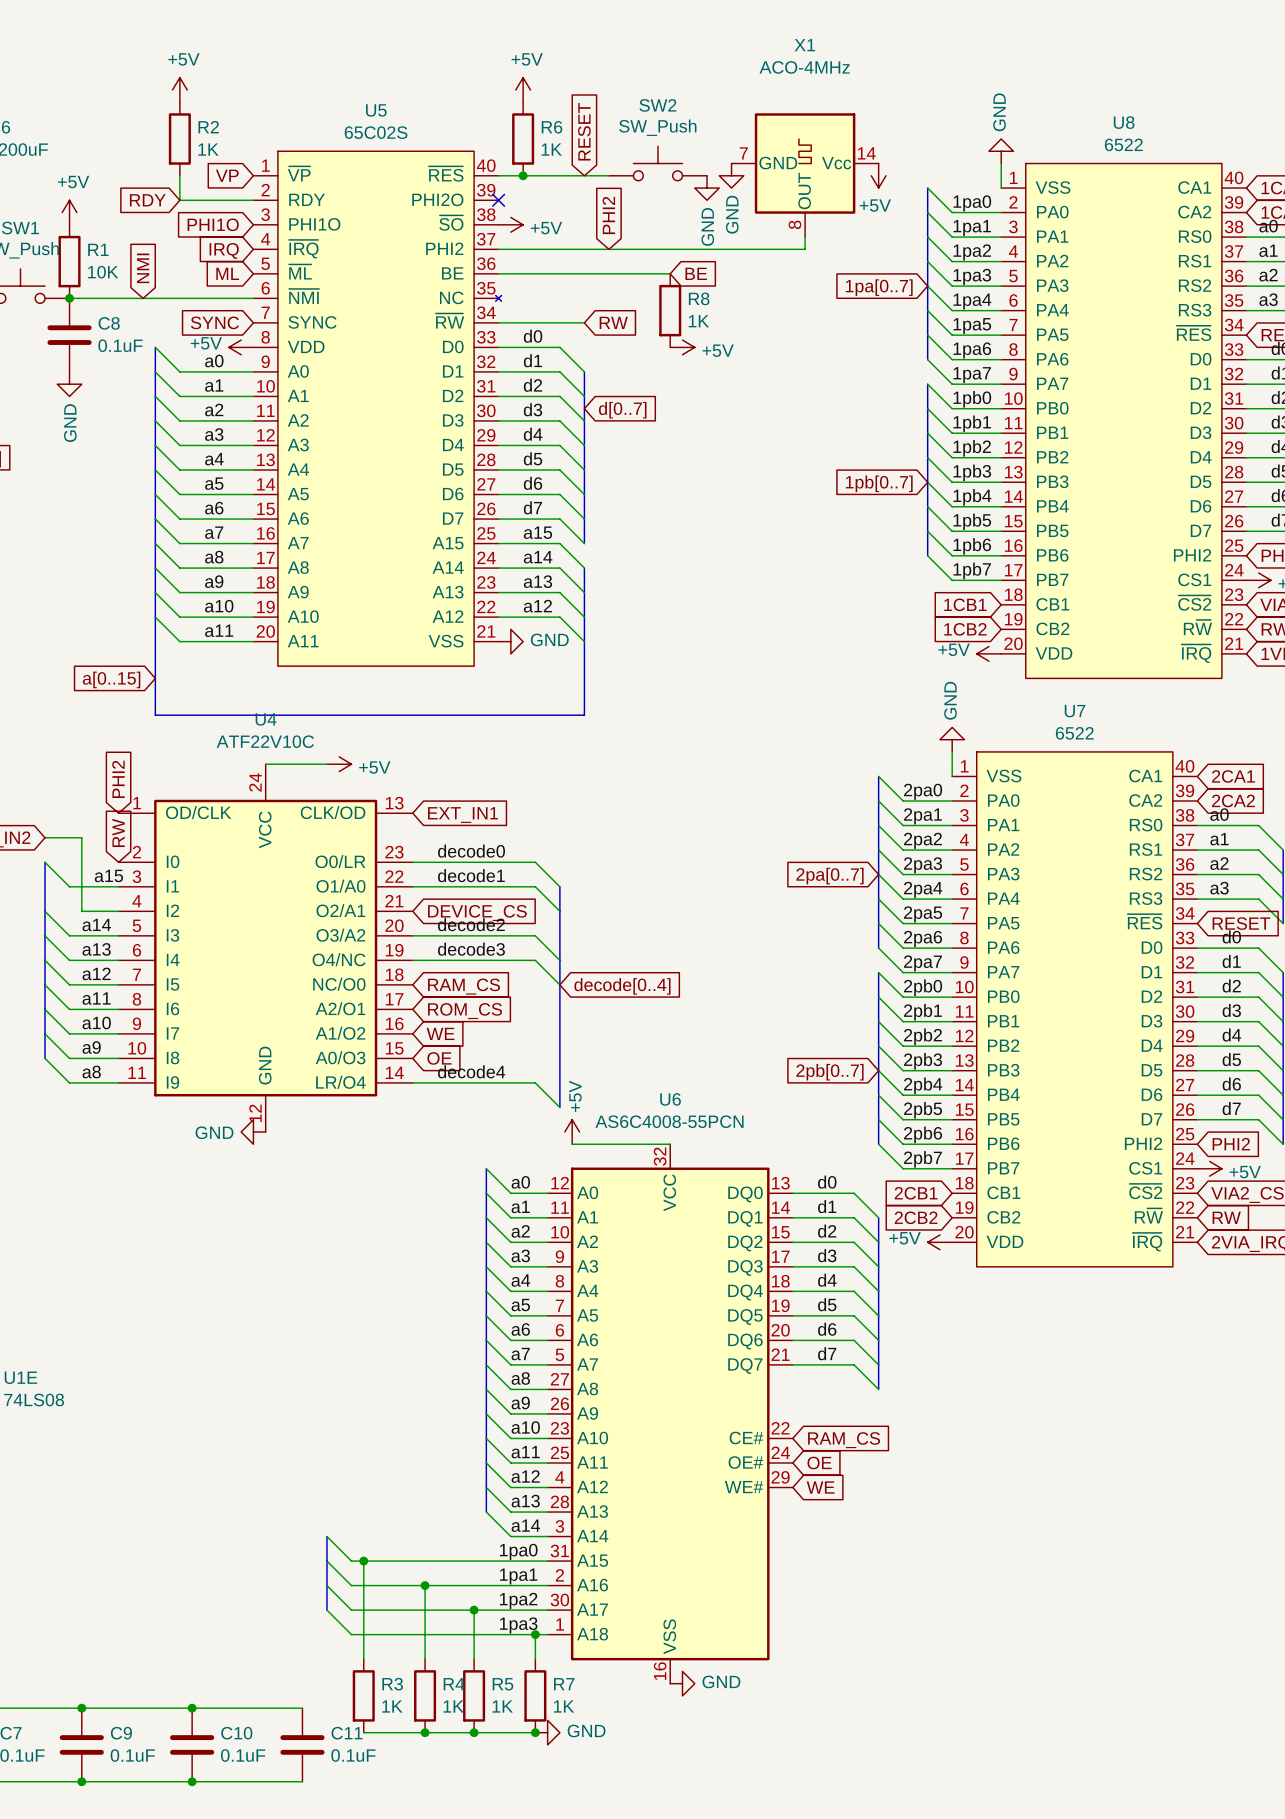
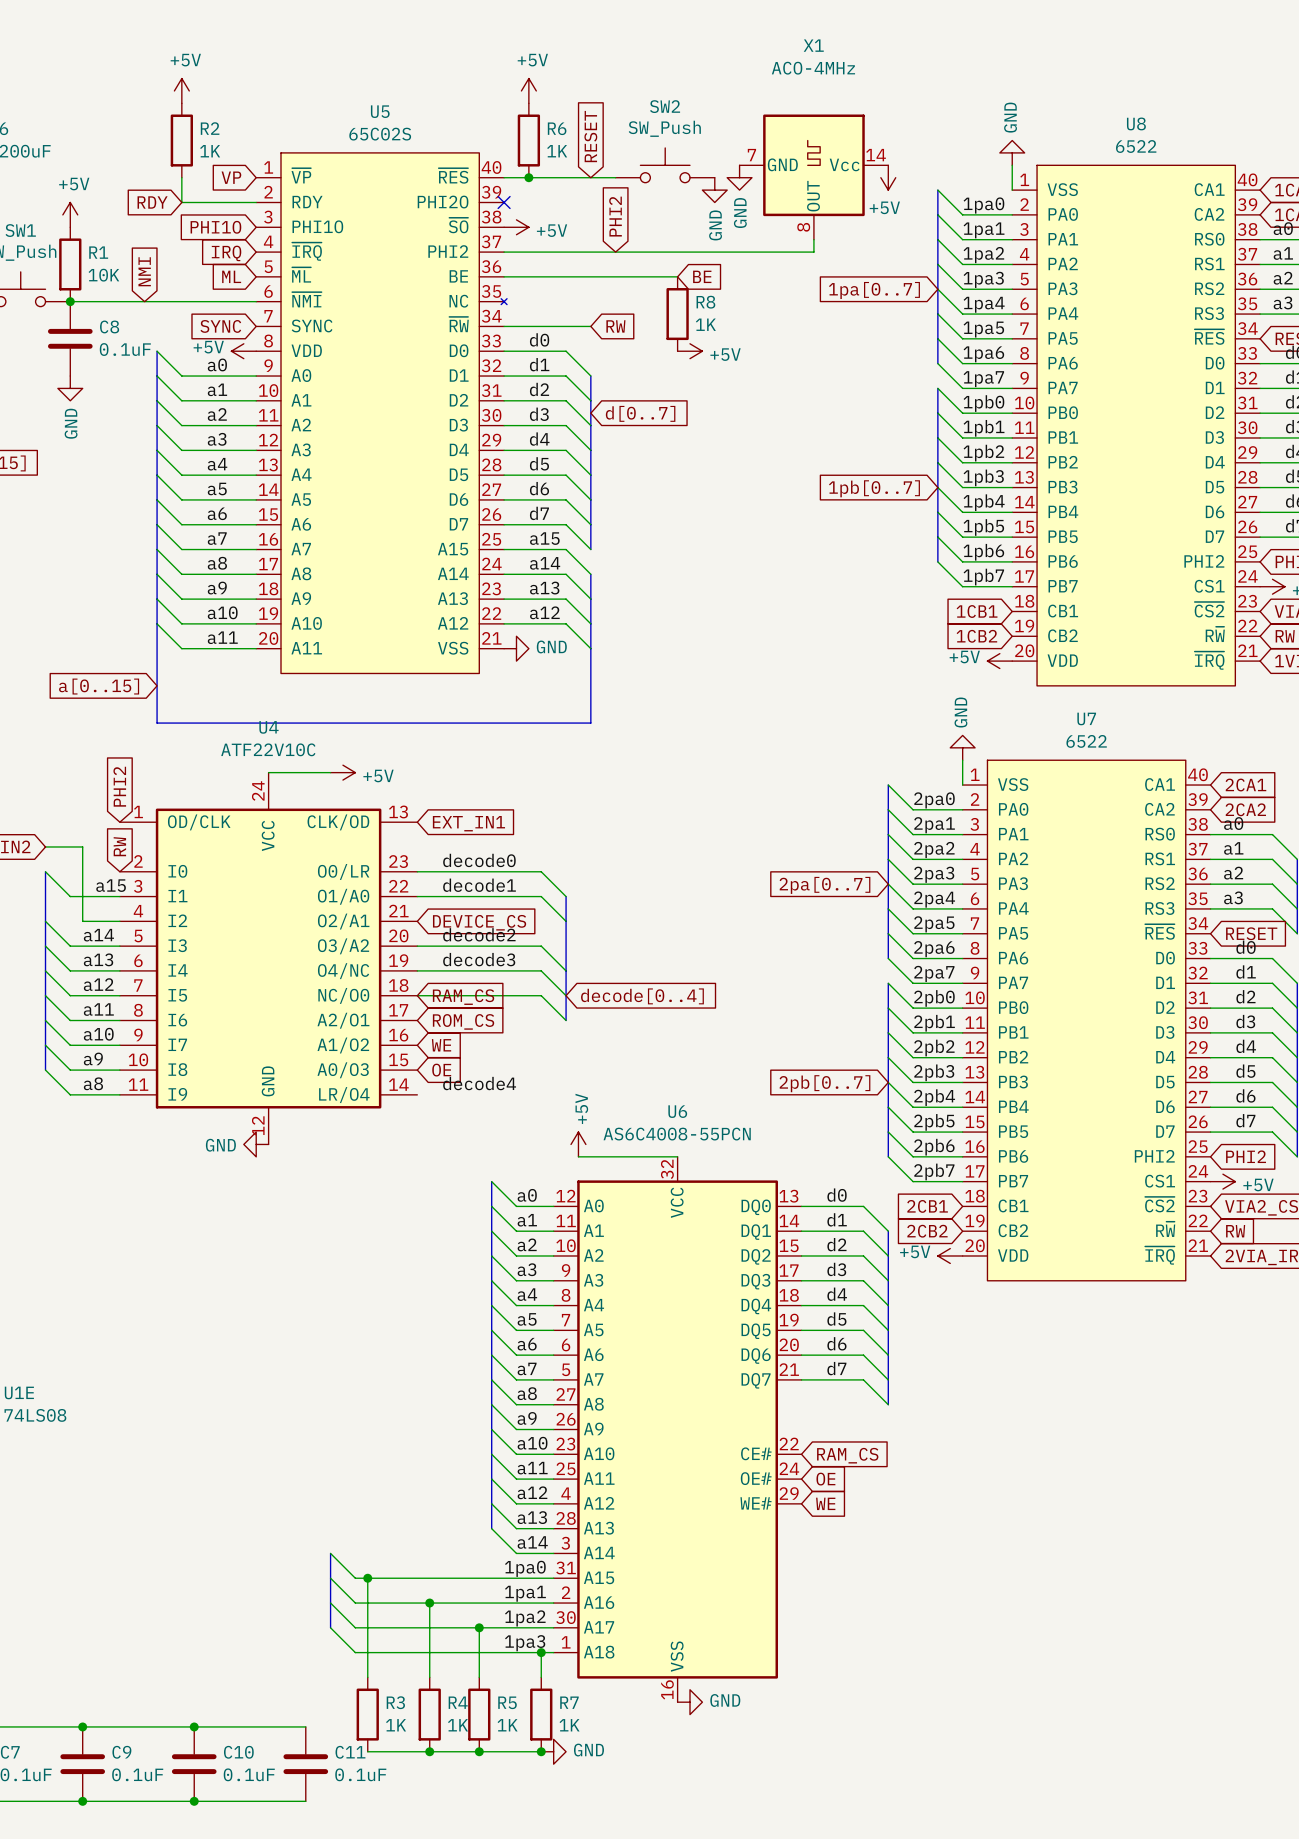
bus: (559, 1009) (559, 1107) -> none
wire: (412, 1082) (535, 1082) (559, 1107) -> (417, 995) (541, 995) (566, 1020)

